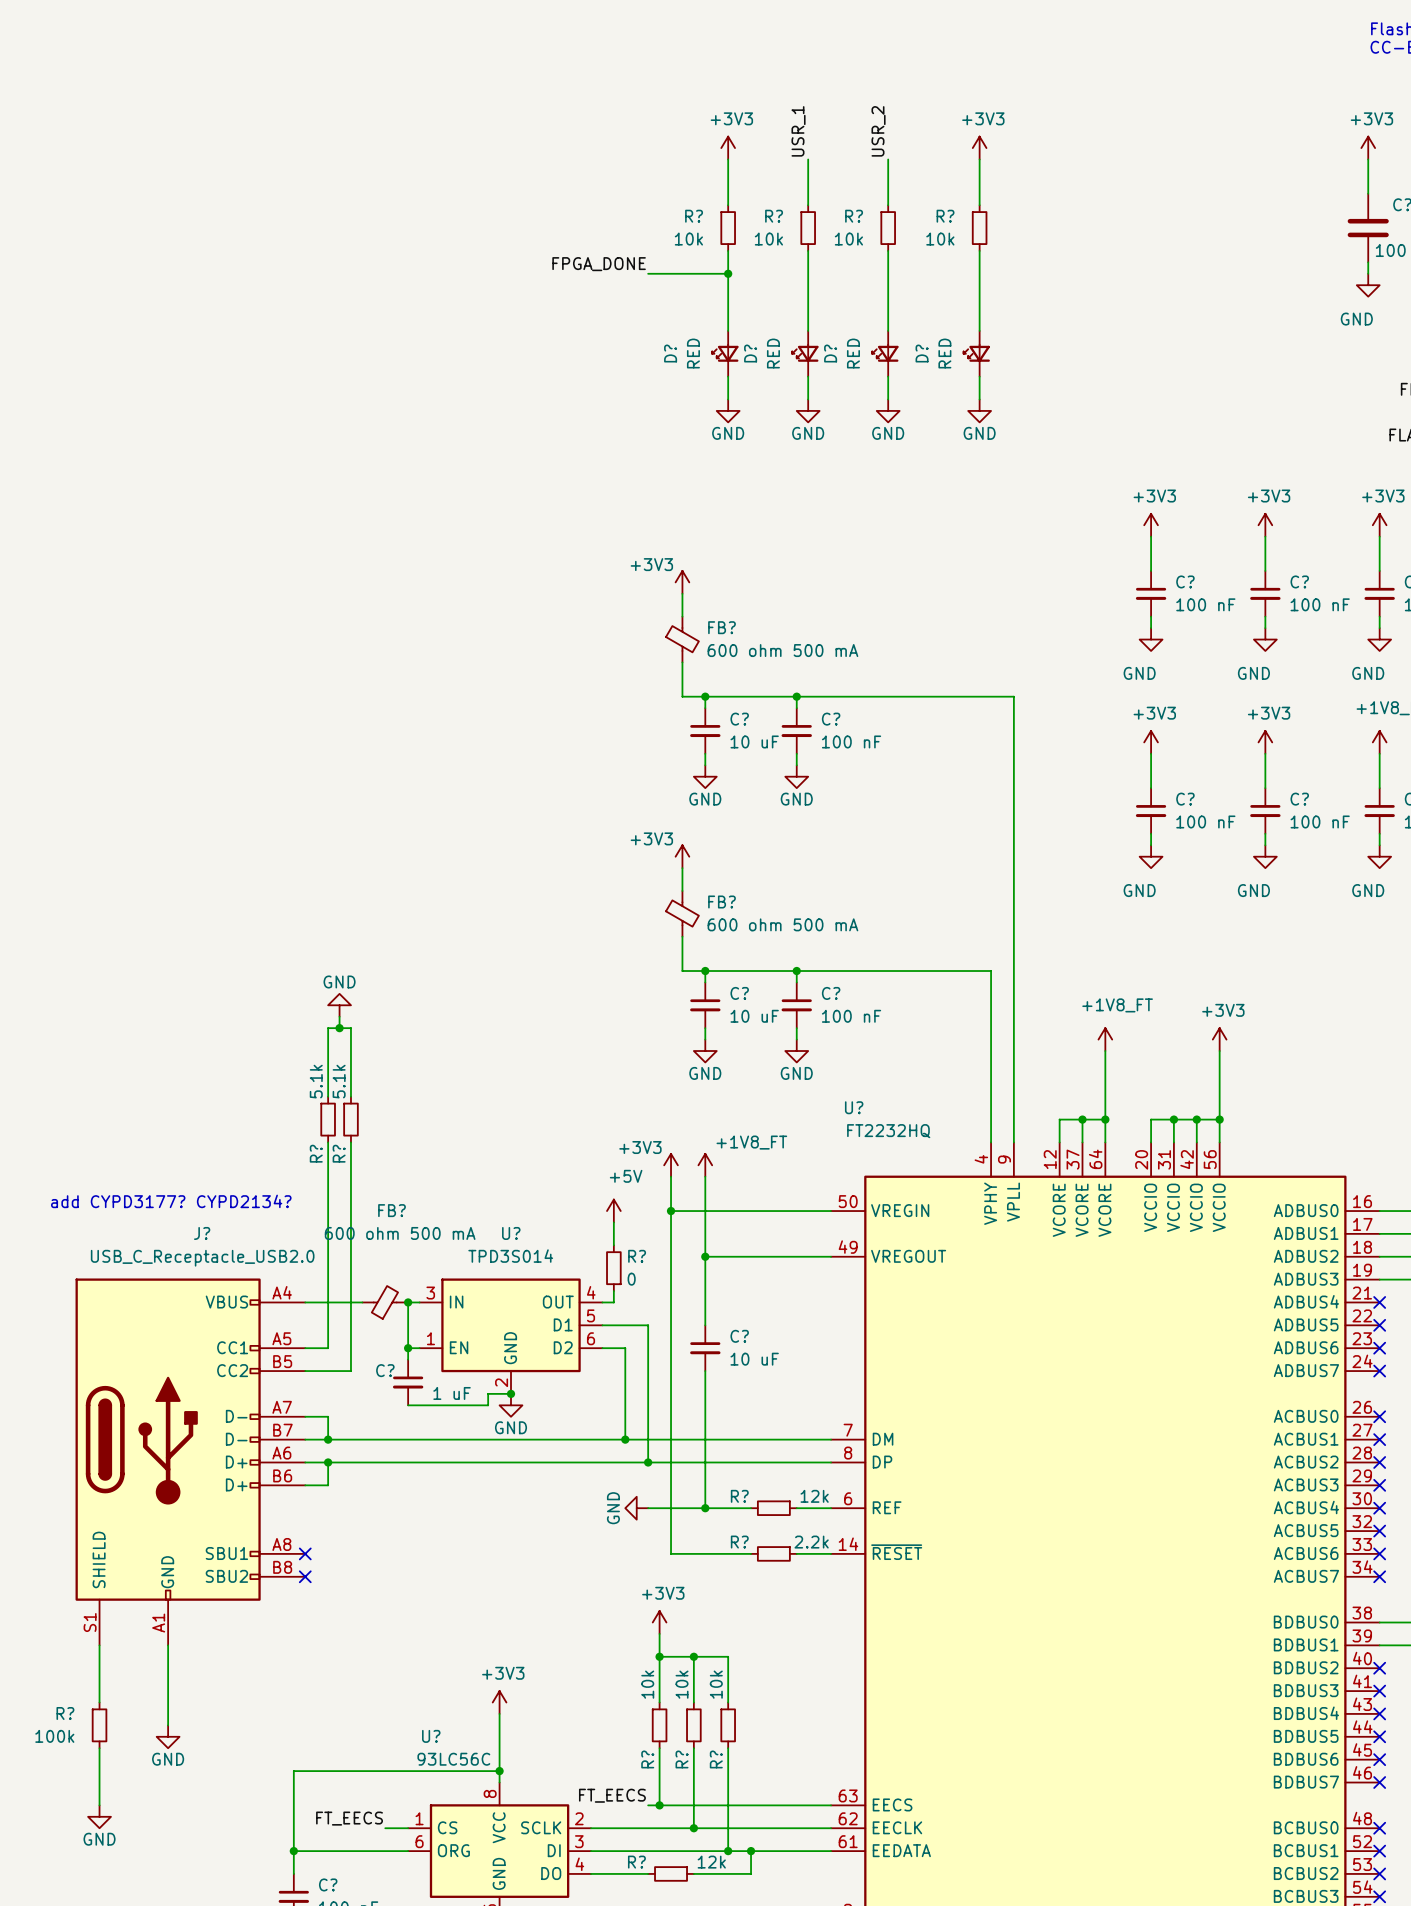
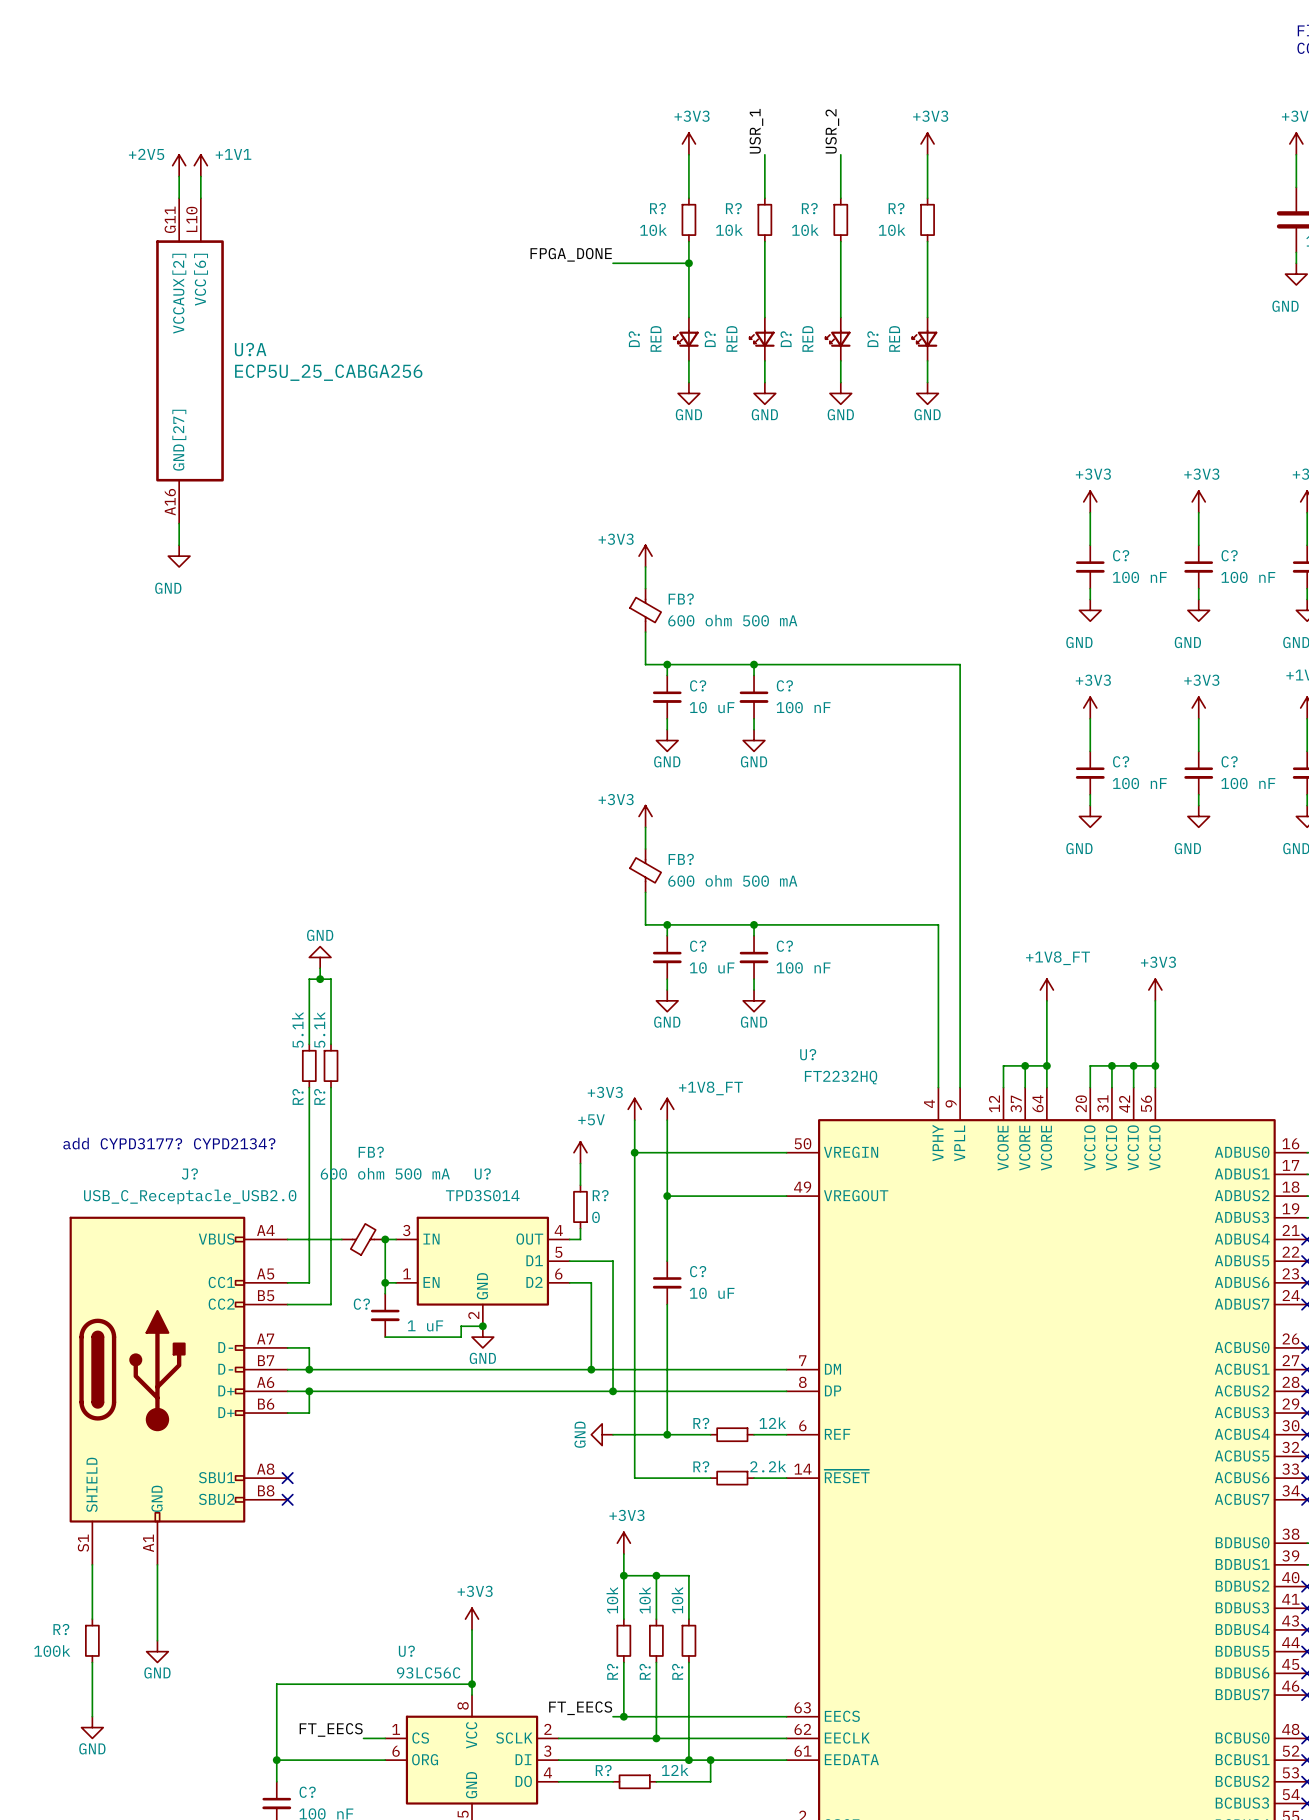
power symbol: none -> +2V5 (179, 165)
power symbol: none -> +1V1 (200, 165)
wire: none -> (179, 176) (179, 198)
wire: none -> (200, 176) (200, 198)
U?A: none -> ECP5U_25_CABGA256 (190, 360)
wire: none -> (179, 523) (179, 545)
power symbol: none -> GND (179, 556)

